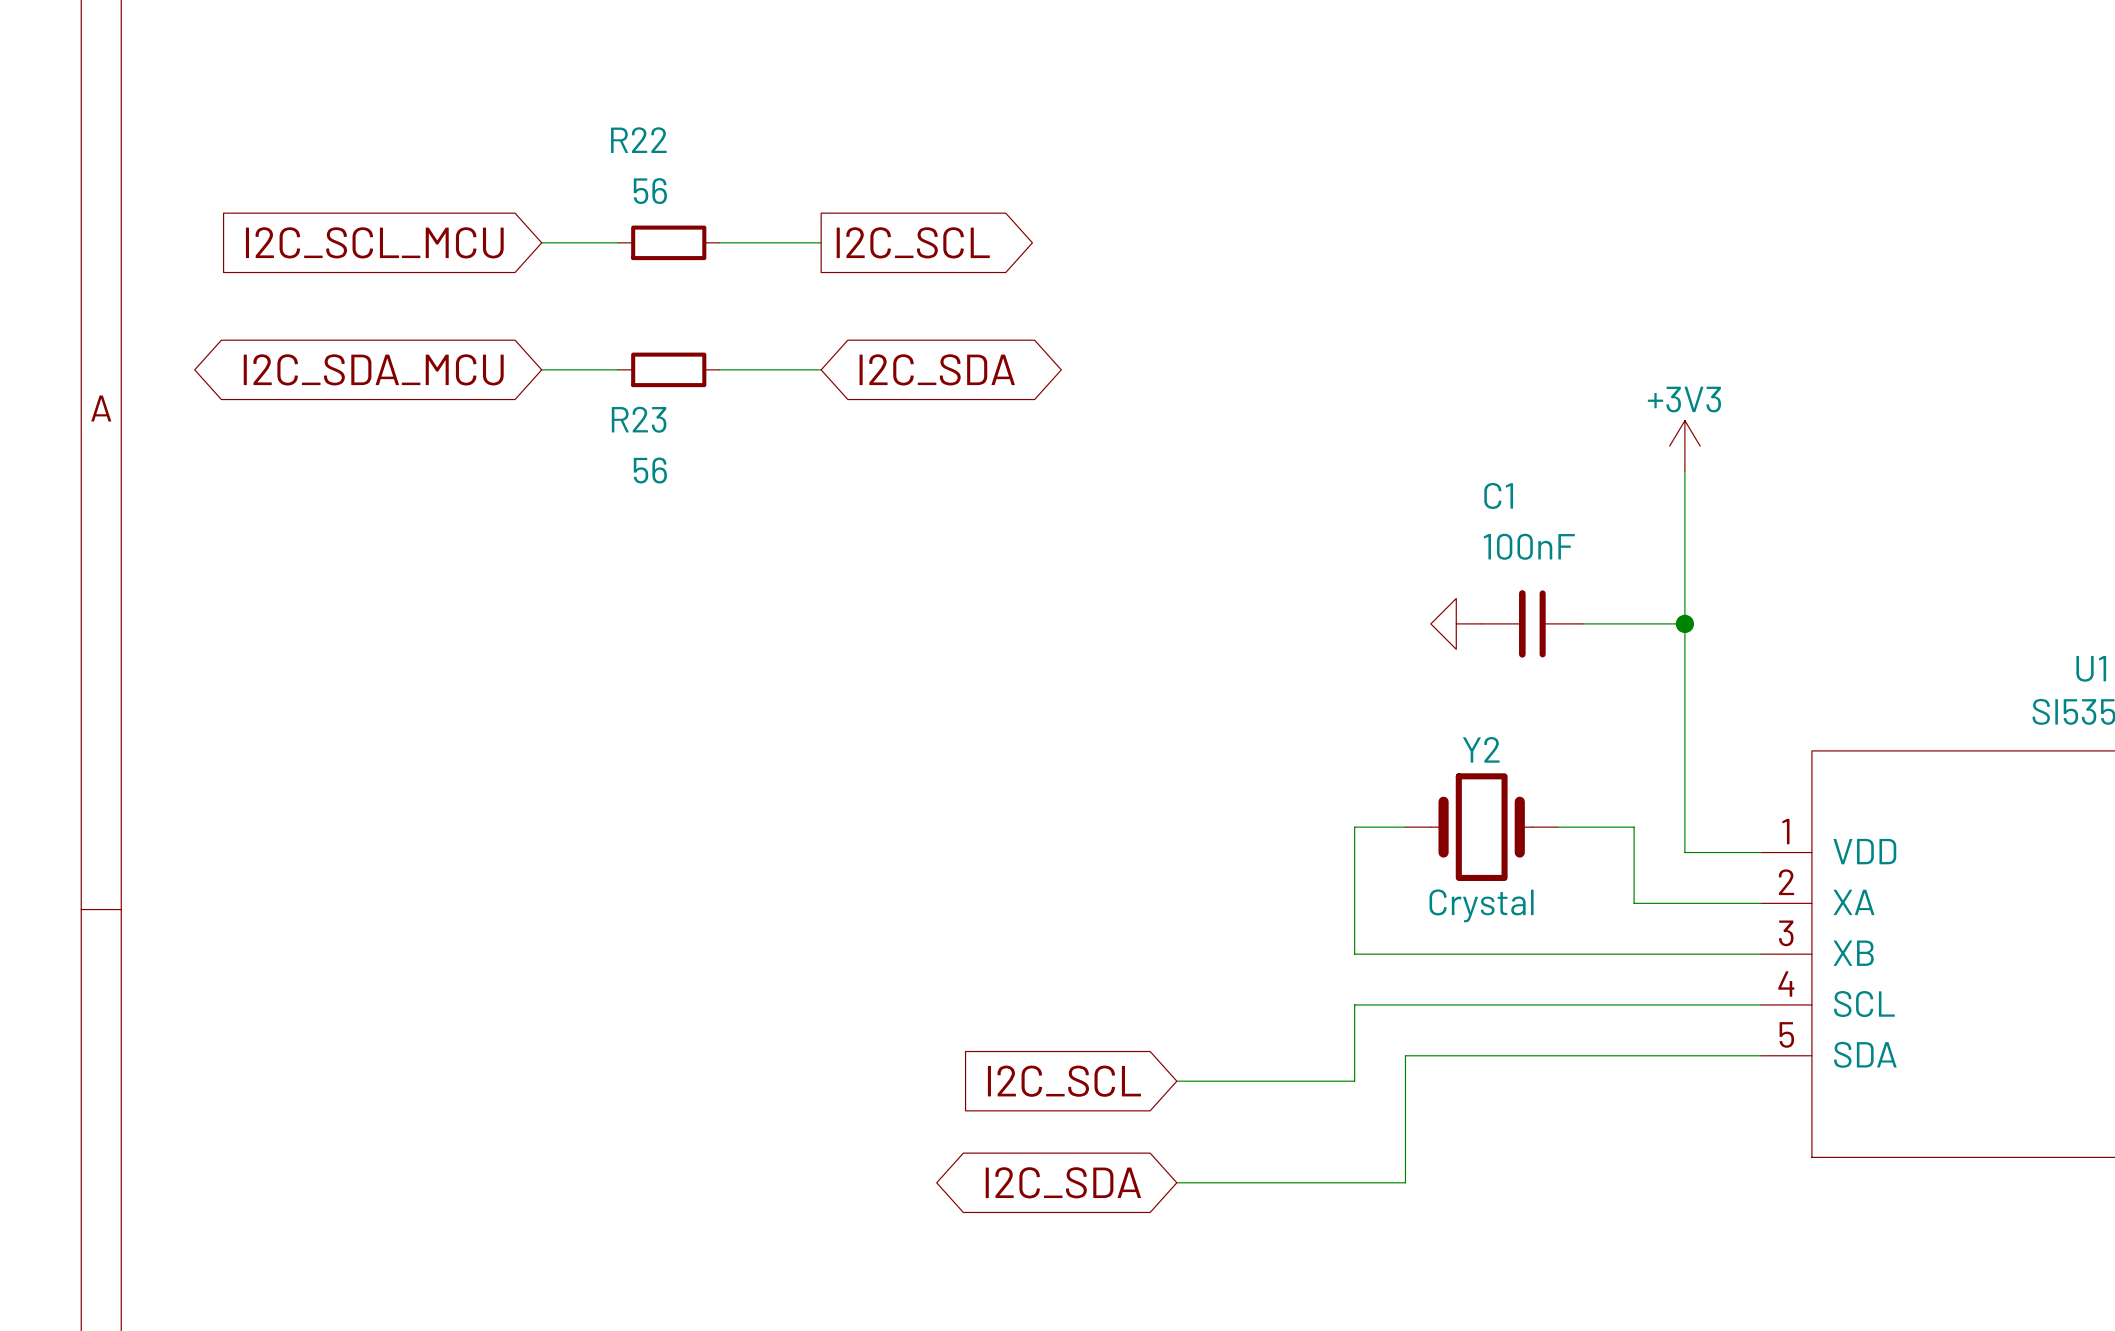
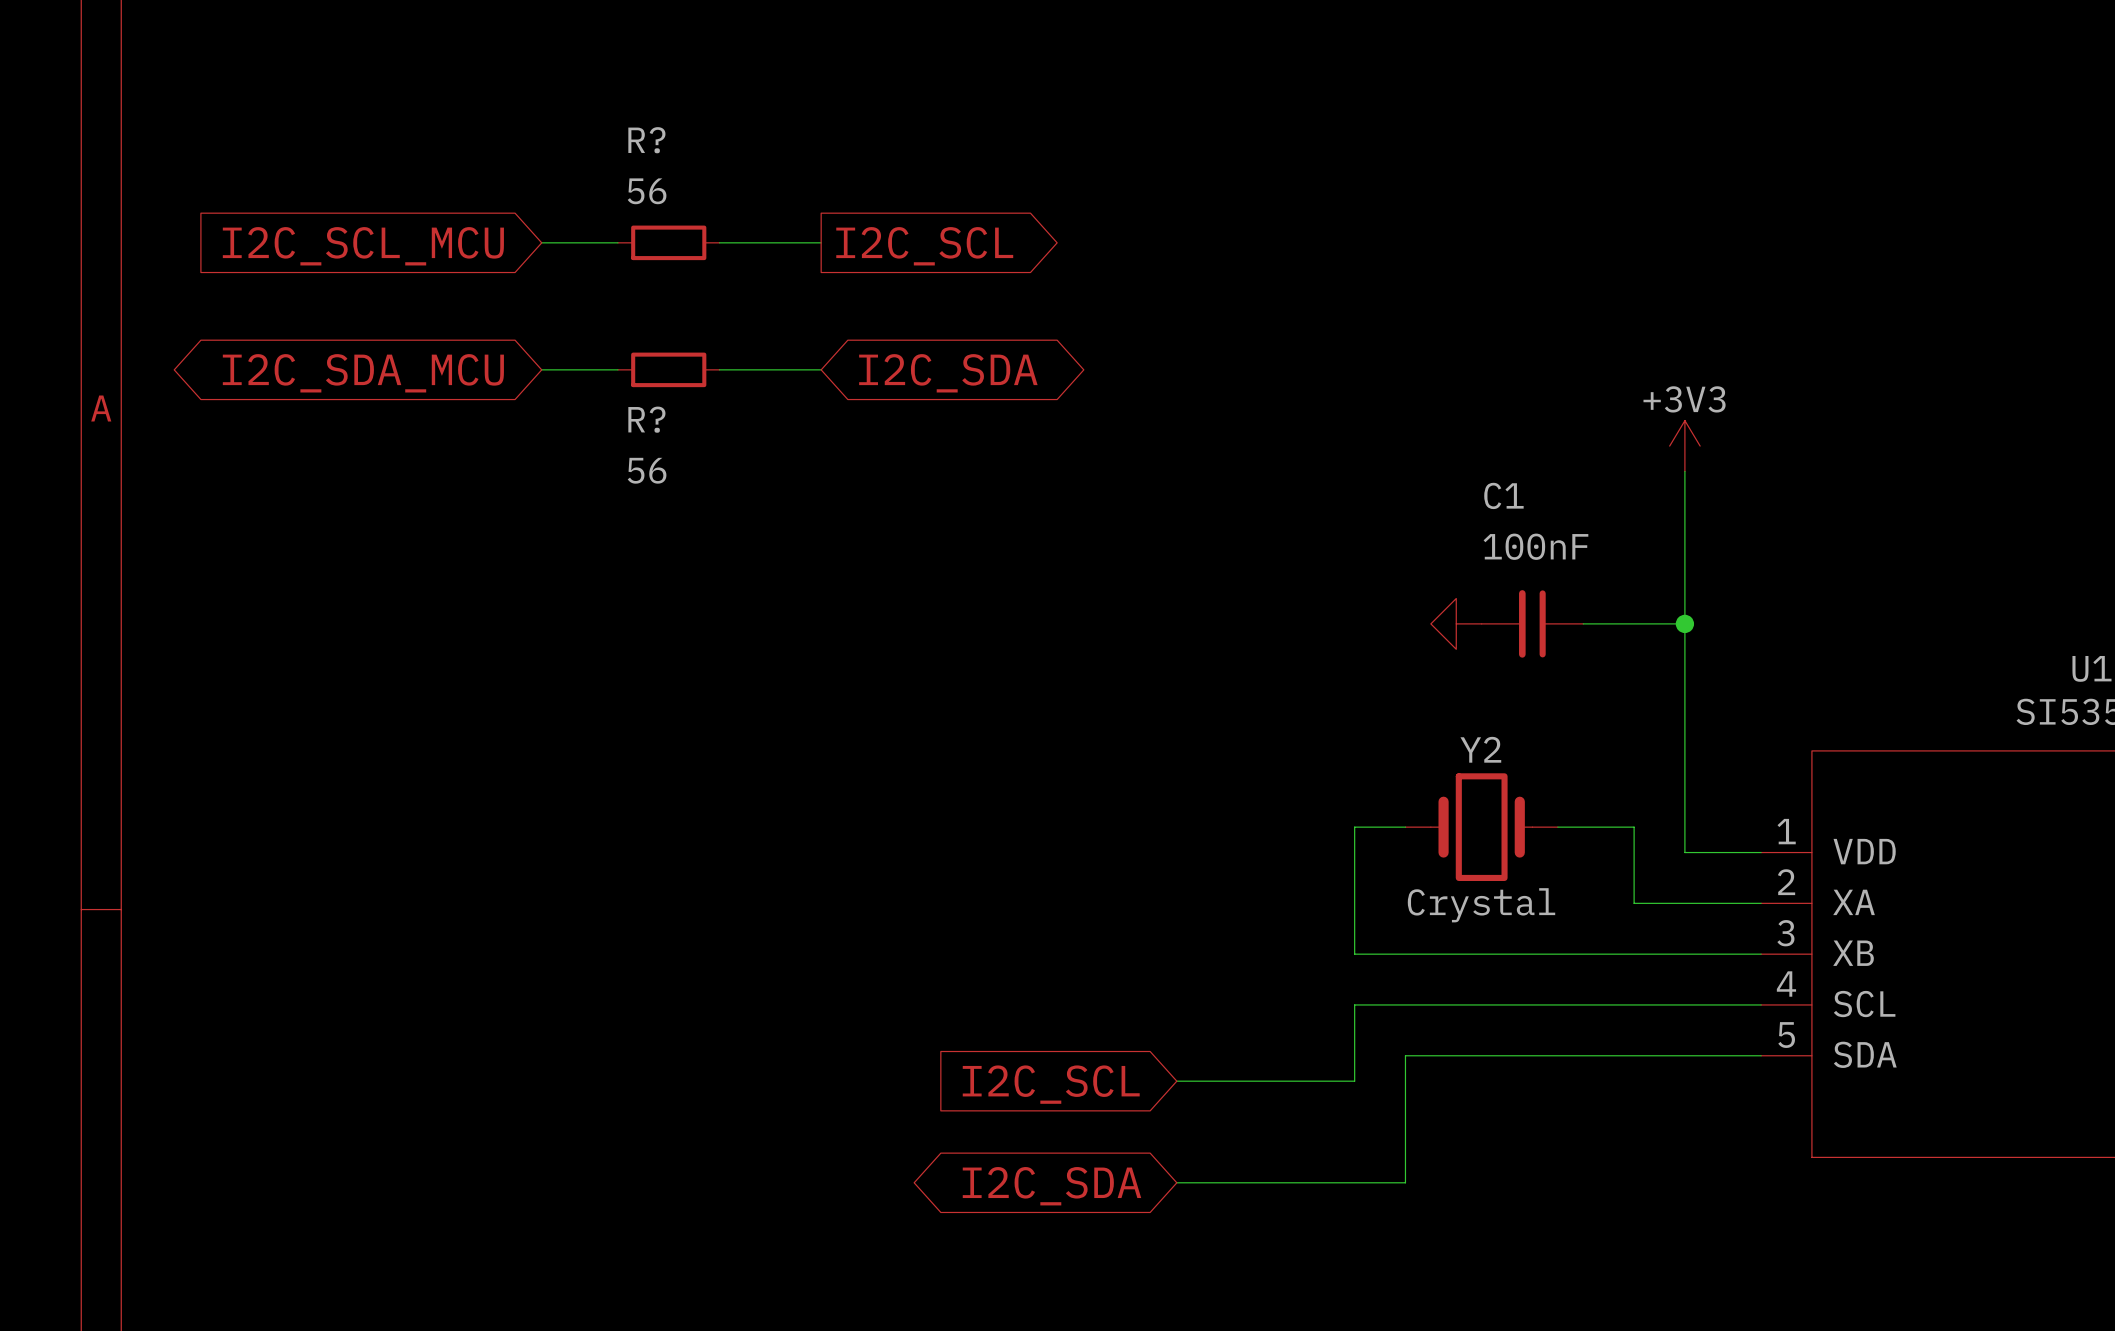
R22 name: R22 (638, 140) -> R? (646, 140)
R23 name: R23 (639, 419) -> R? (646, 419)

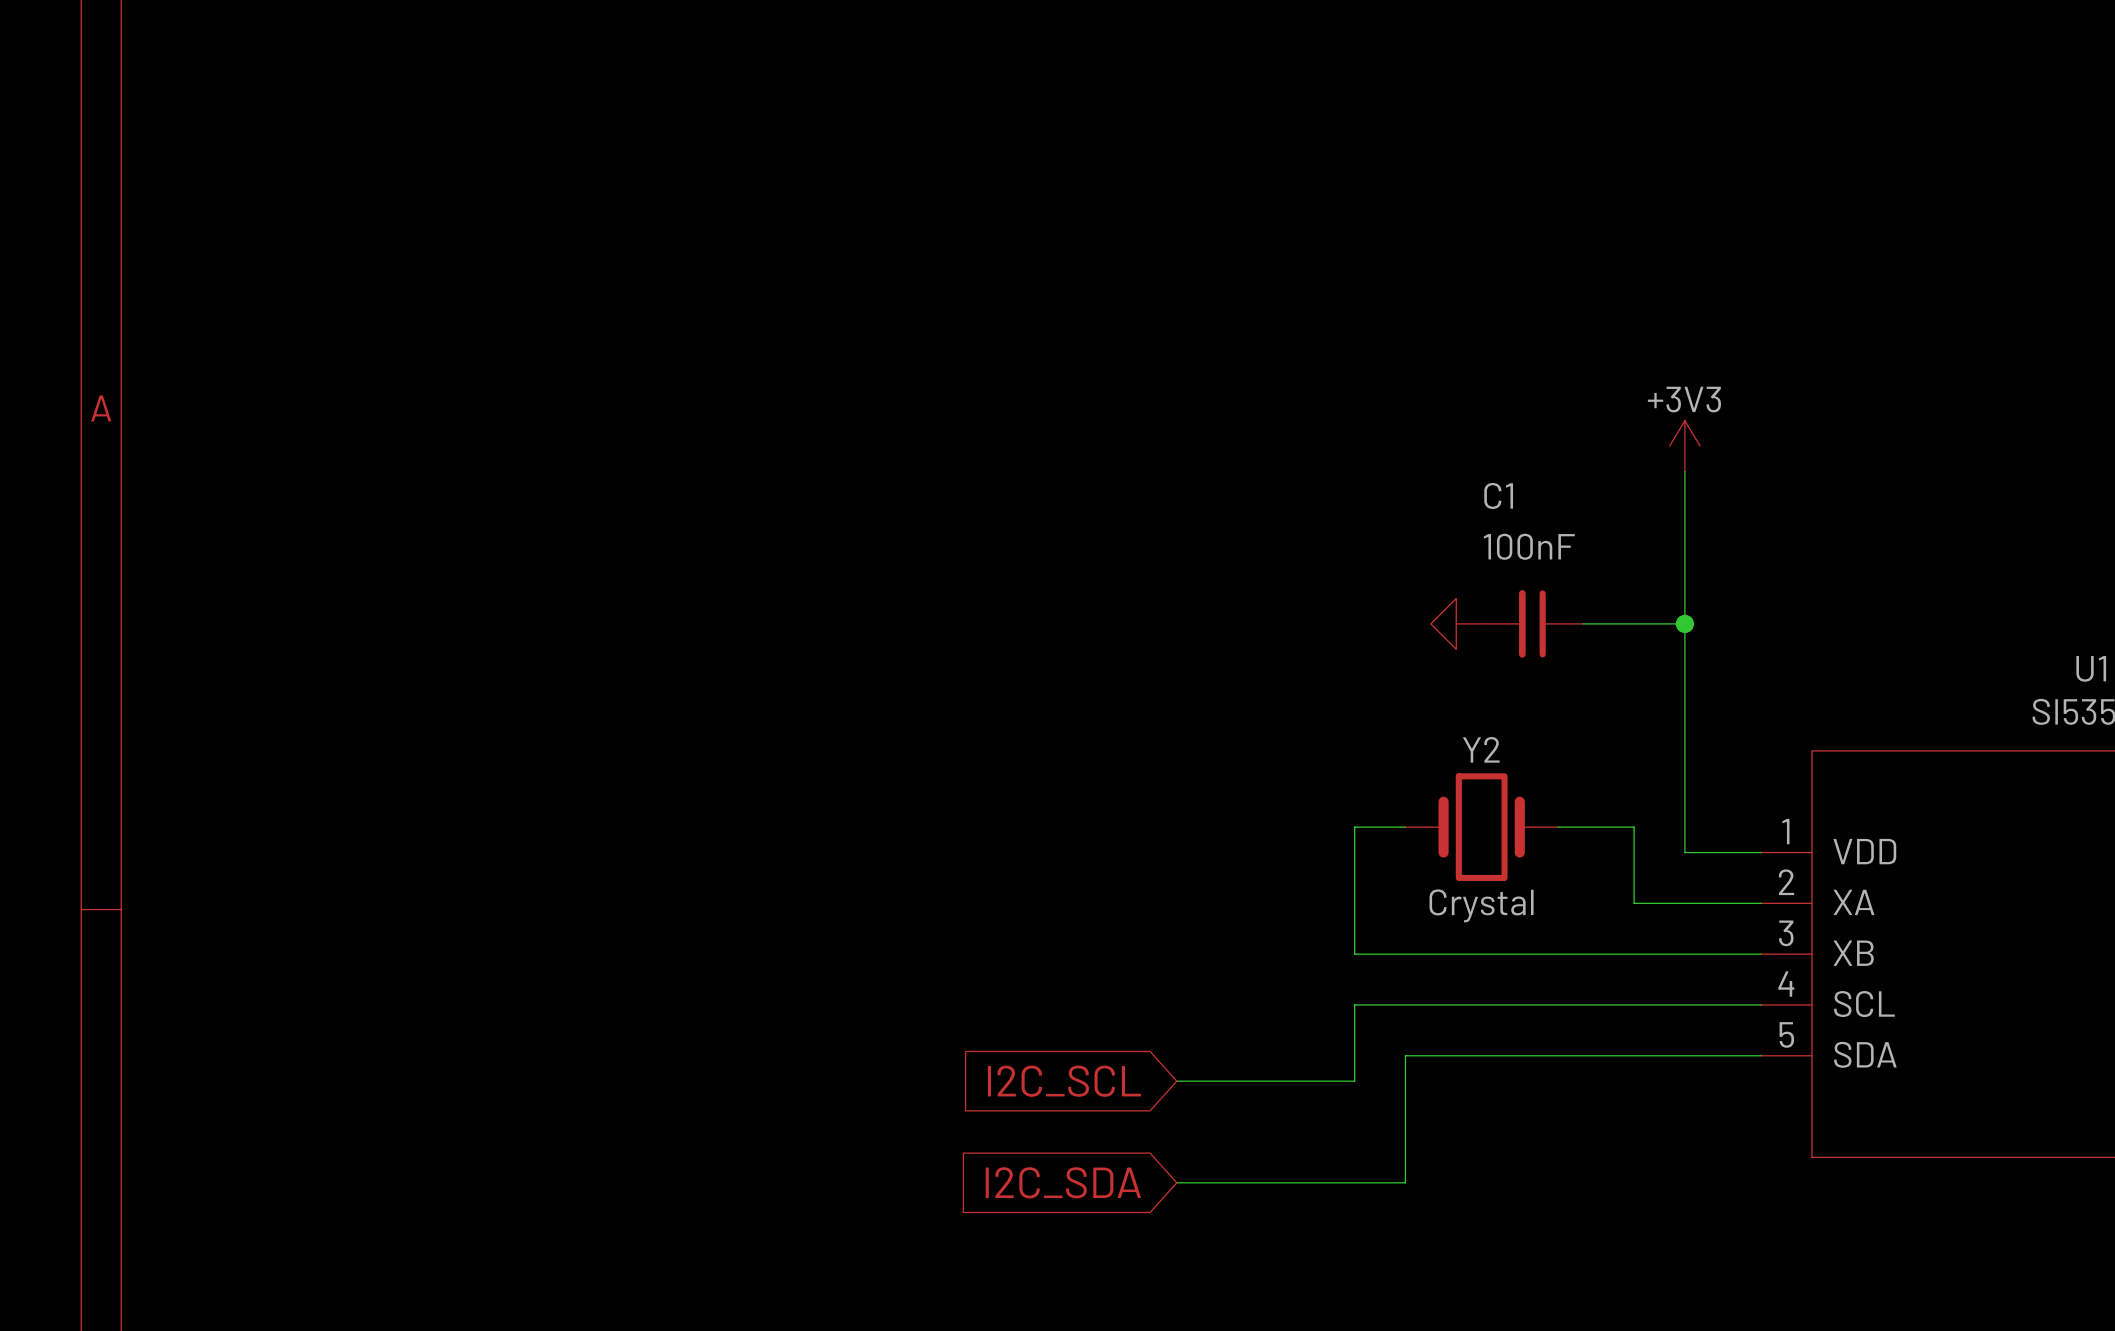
wire: (541, 242) (617, 242) -> none
R?: 56 (668, 242) -> none
wire: (719, 242) (821, 242) -> none
global label: I2C_SCL_MCU (363, 246) -> none
global label: I2C_SCL (924, 246) -> none
wire: (541, 369) (617, 369) -> none
R?: 56 (668, 369) -> none
wire: (719, 369) (821, 369) -> none
global label: I2C_SDA_MCU (363, 373) -> none
global label: I2C_SDA (948, 373) -> none
global label shape: bidirectional (1051, 1186) -> input (1063, 1182)

